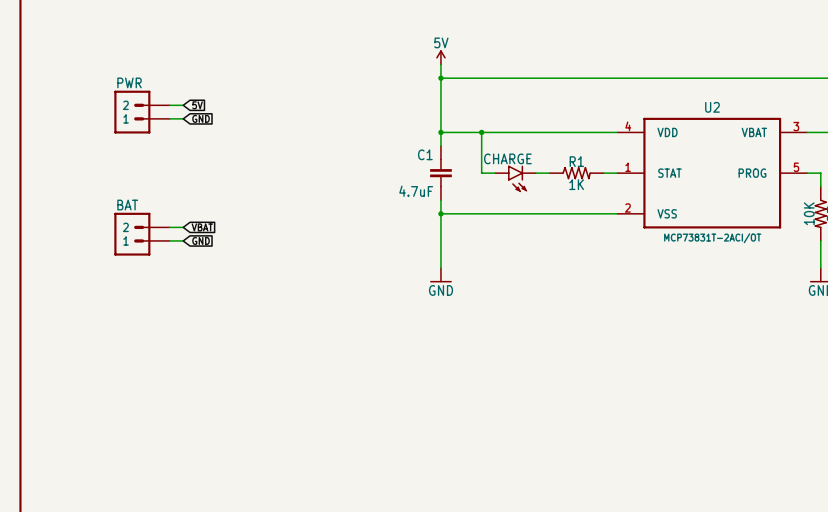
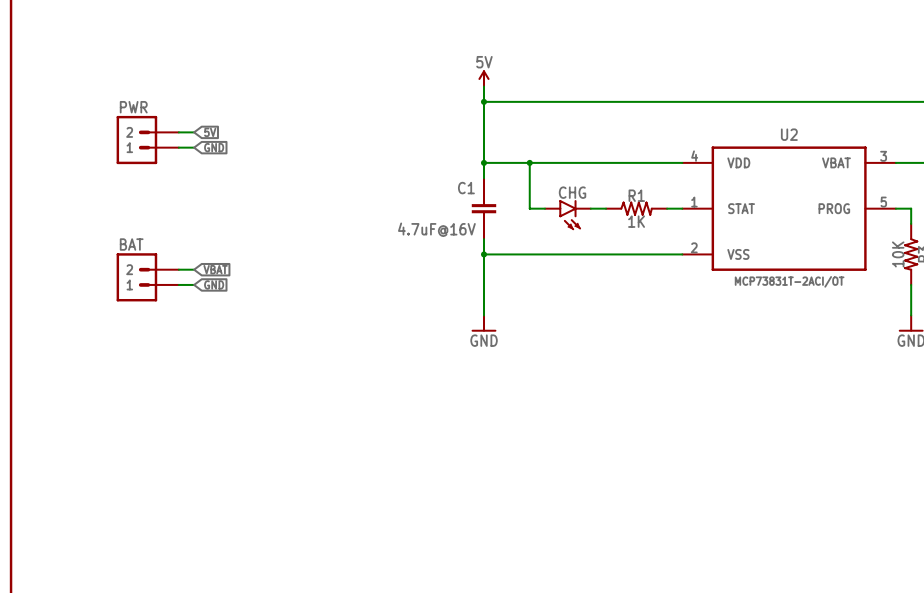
CHARGE name: CHARGE (507, 158) -> CHG (572, 192)
C1 value: 4.7uF (416, 191) -> 4.7uF@16V (436, 229)

